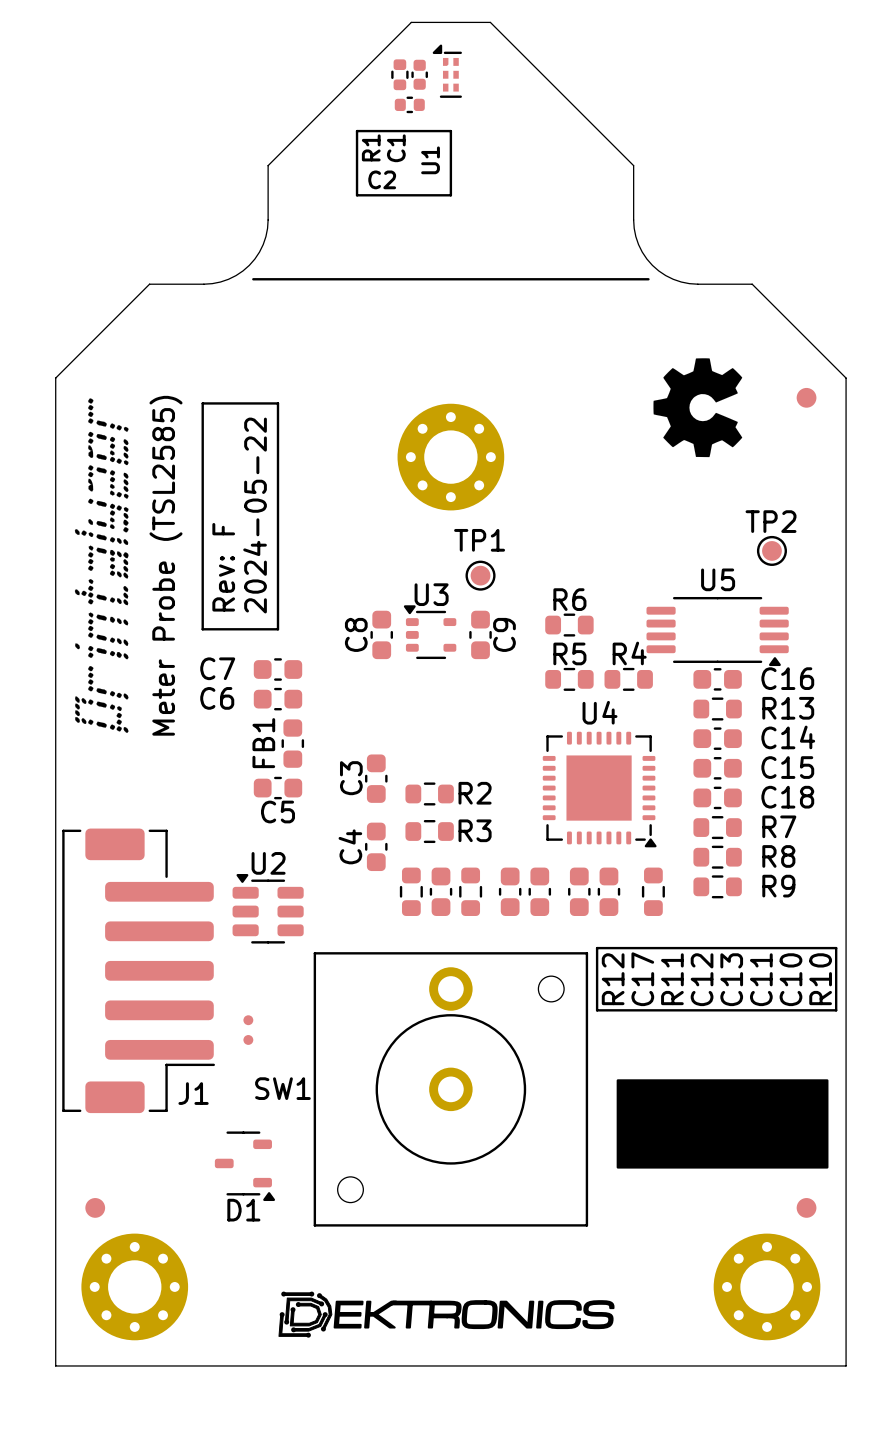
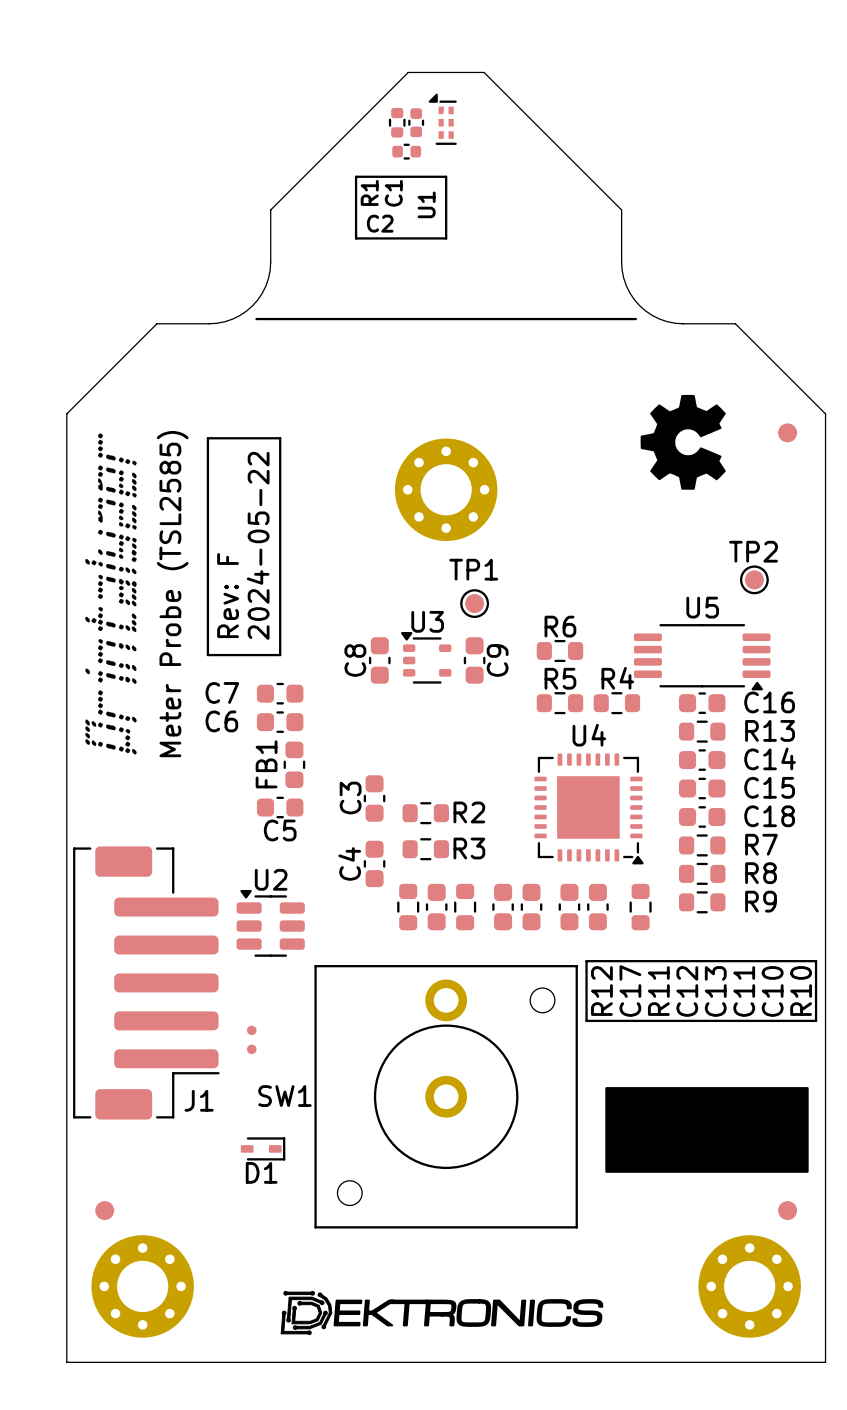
D1 footprint: [214, 1131, 276, 1202] -> [240, 1137, 286, 1161]

